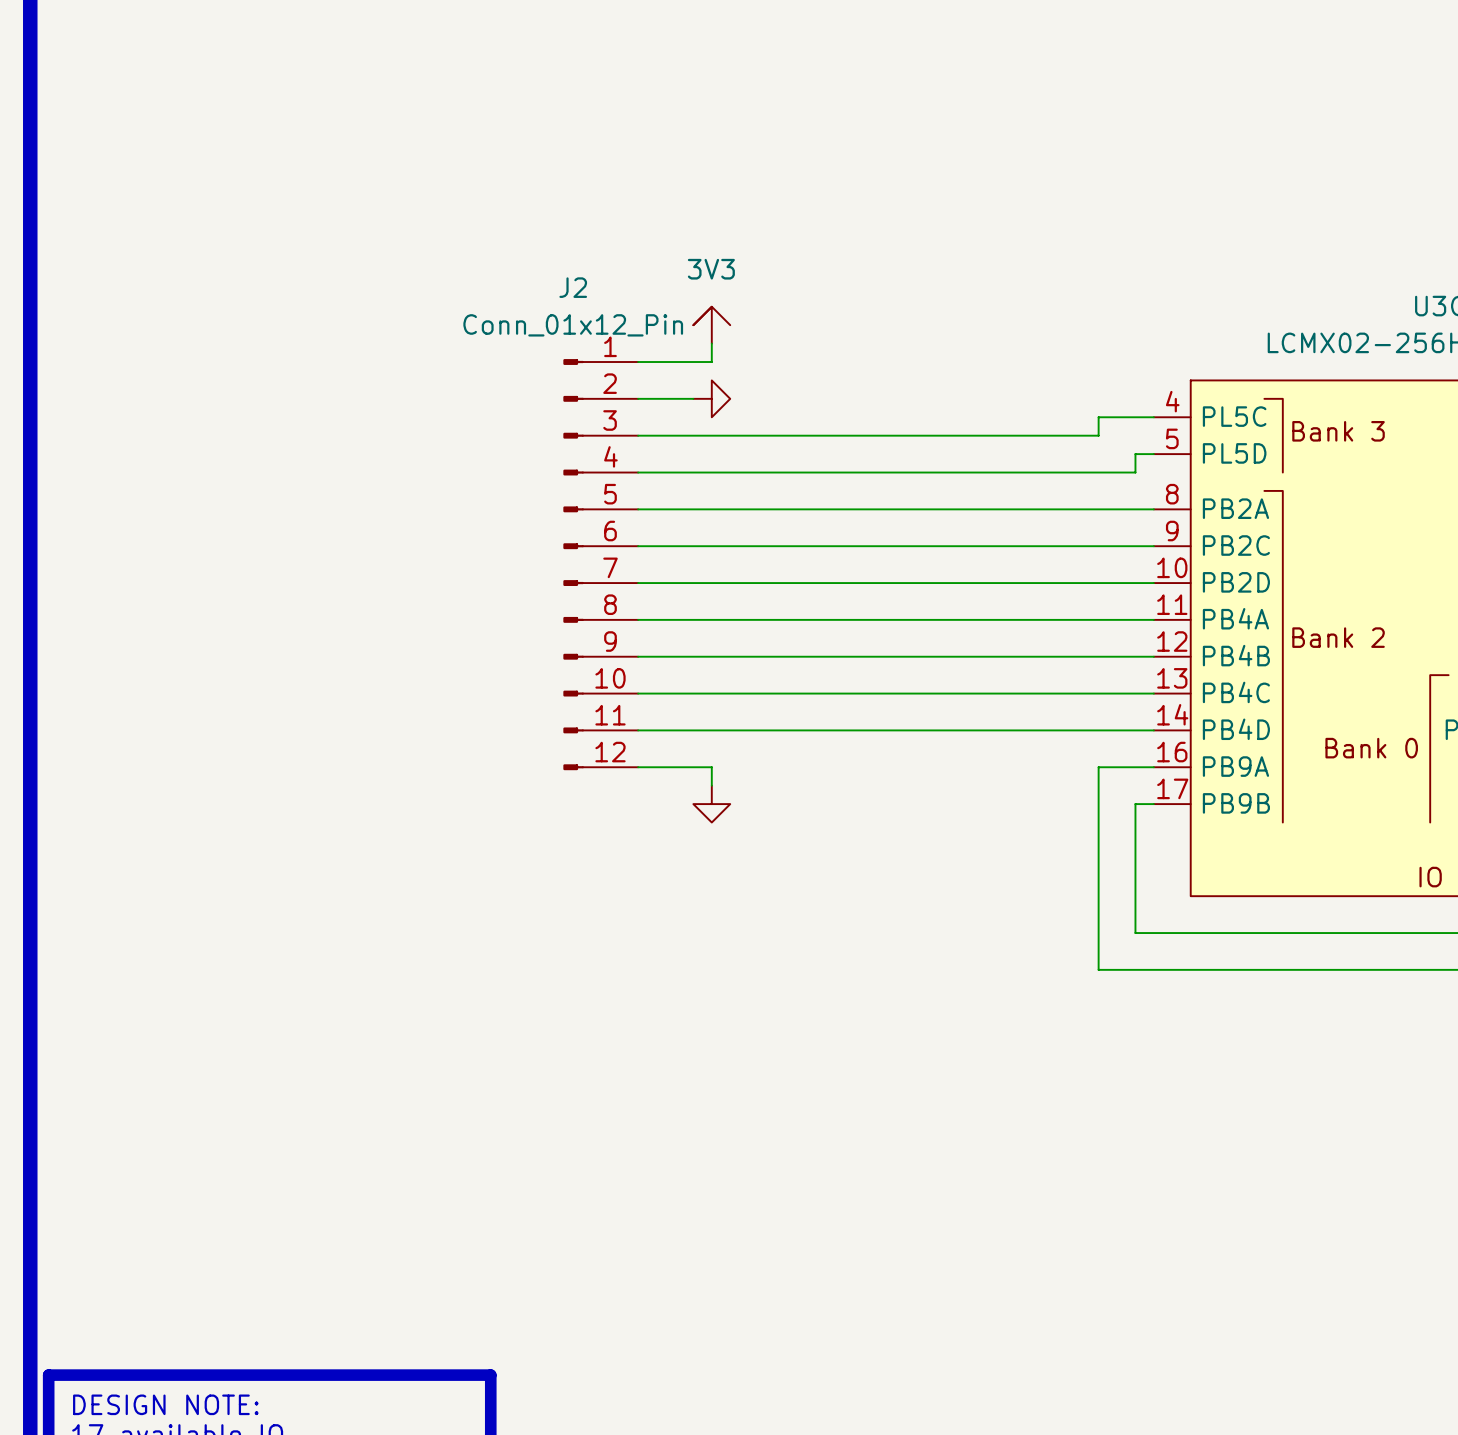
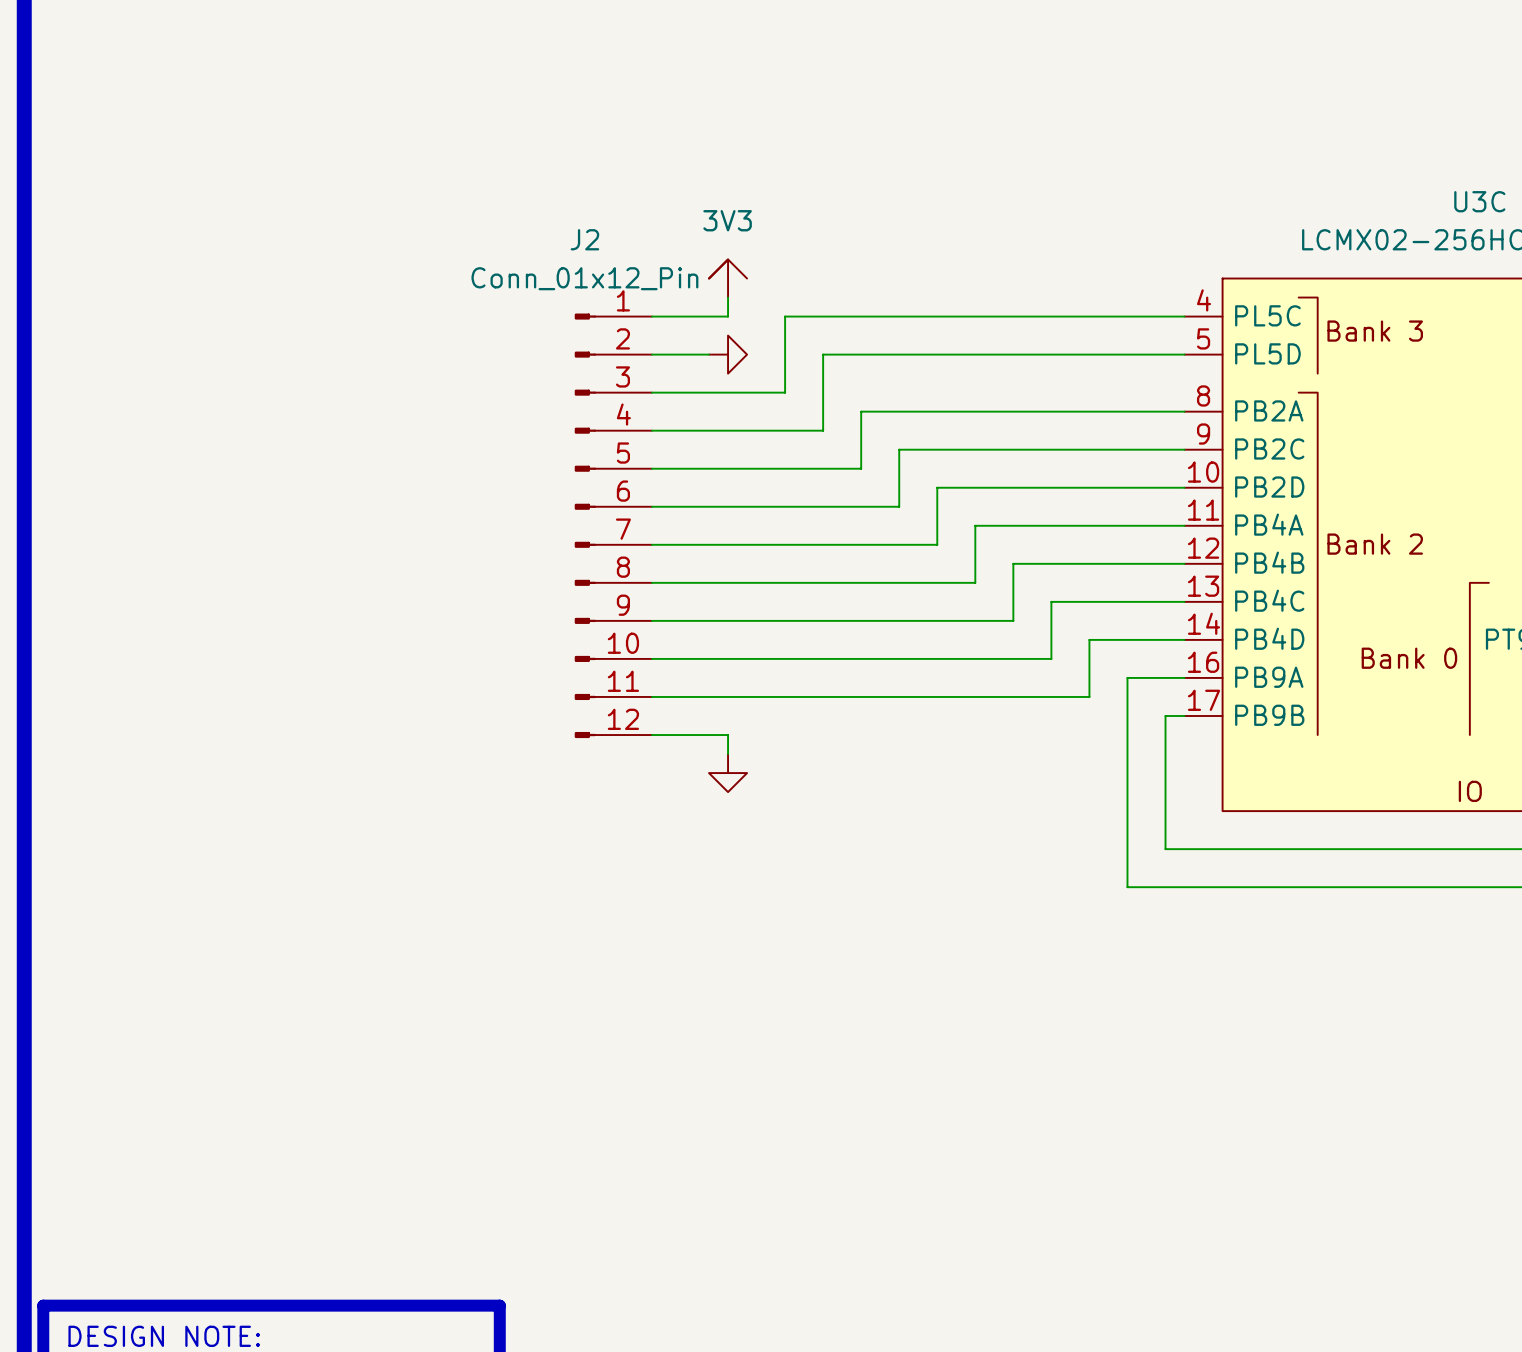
power symbol position: 3V3 (711, 325) -> 3V3 (728, 278)
wire: (711, 343) (711, 362) (638, 362) -> (728, 297) (728, 316) (651, 316)
wire: (638, 398) (693, 398) -> (651, 354) (709, 354)
power symbol position: (711, 398) -> (728, 354)
wire: (1098, 417) (1098, 435) (638, 435) -> (1127, 316) (785, 316) (785, 392) (651, 392)
wire: (1135, 454) (1135, 472) (638, 472) -> (1165, 354) (823, 354) (823, 430) (651, 430)
wire: (638, 509) (840, 509) -> (651, 468) (861, 468) (861, 411)
wire: (638, 546) (877, 546) -> (651, 506) (899, 506) (899, 449)
J2 position: (600, 564) -> (613, 525)
wire: (638, 583) (914, 583) -> (651, 544) (937, 544) (937, 487)
wire: (638, 619) (951, 619) -> (651, 582) (975, 582) (975, 525)
wire: (638, 656) (988, 656) -> (651, 620) (1013, 620) (1013, 563)
wire: (638, 693) (1024, 693) -> (651, 658) (1051, 658) (1051, 601)
wire: (638, 730) (1061, 730) -> (651, 696) (1089, 696) (1089, 639)
wire: (638, 767) (711, 767) (711, 785) -> (651, 735) (728, 735) (728, 754)
power symbol position: (711, 804) -> (728, 773)

